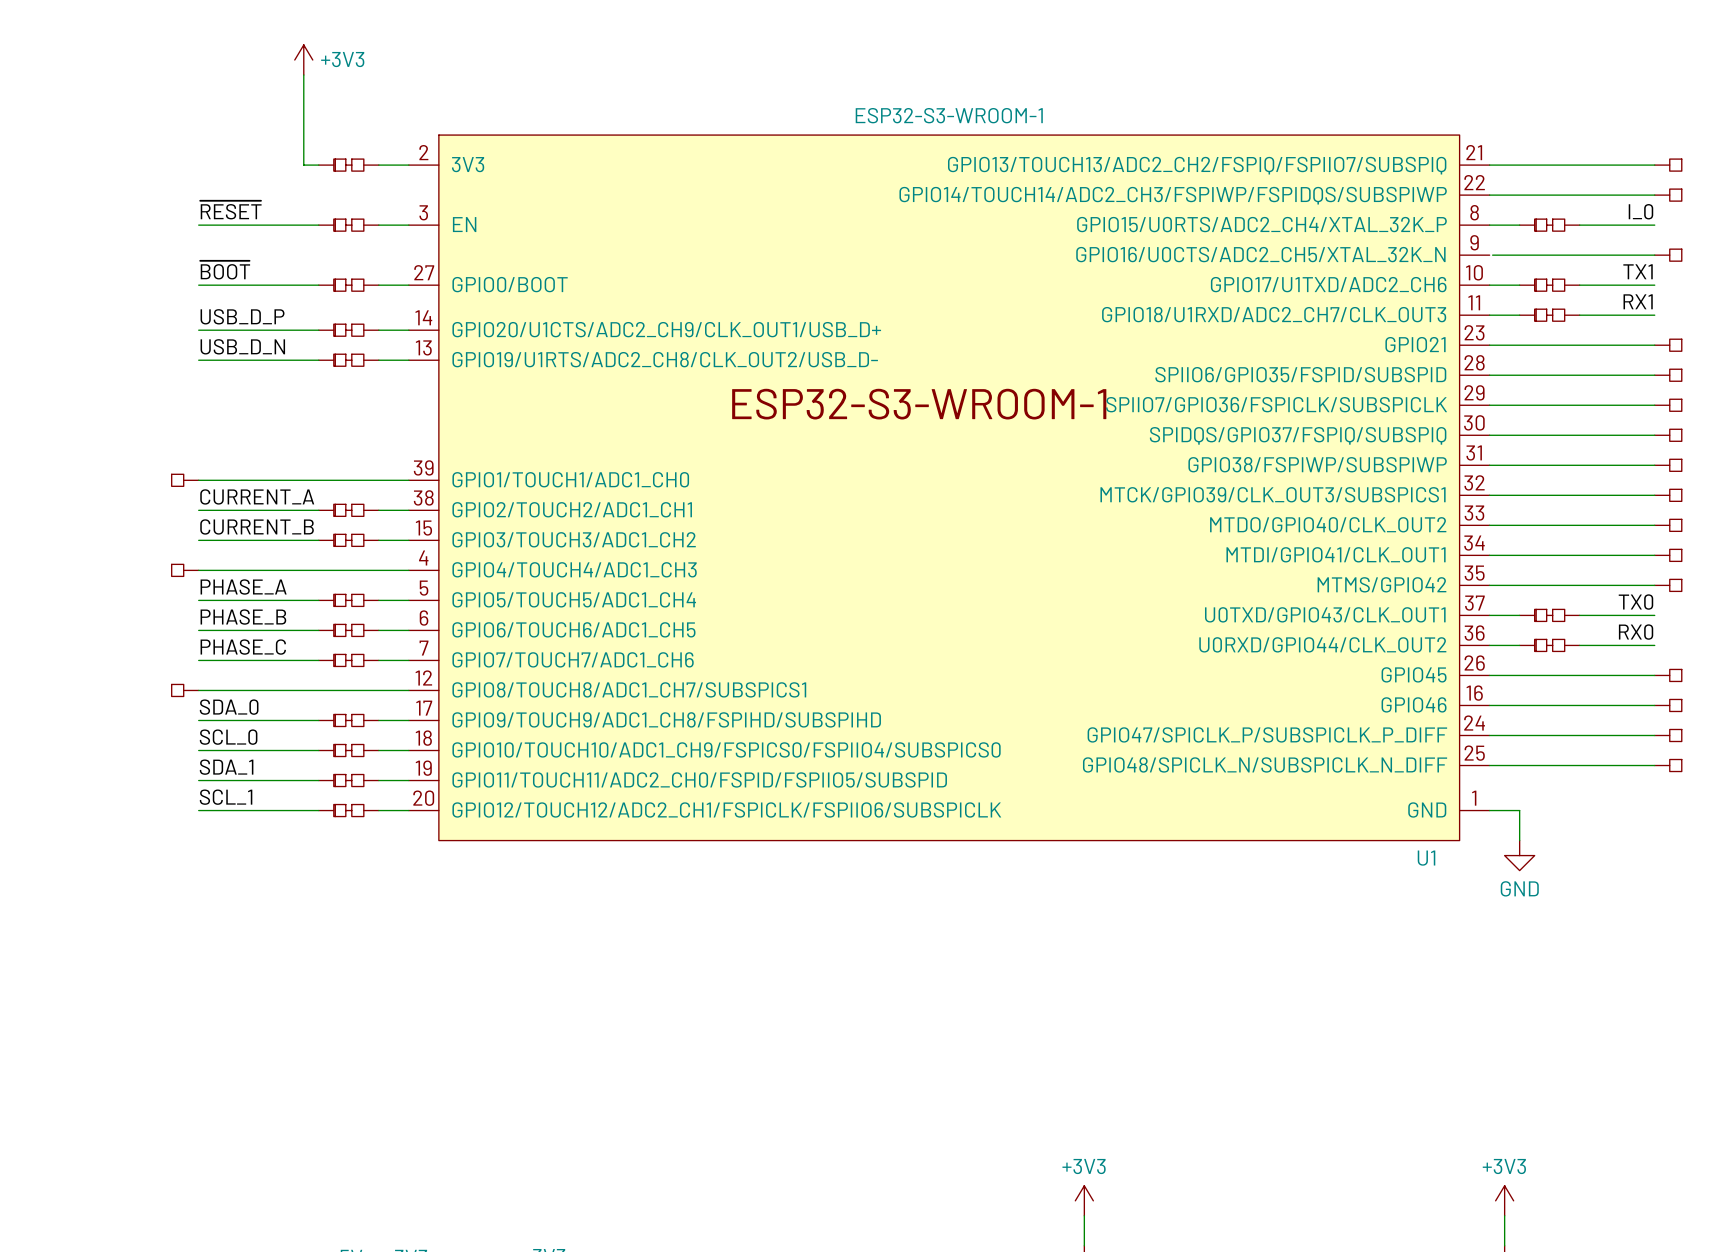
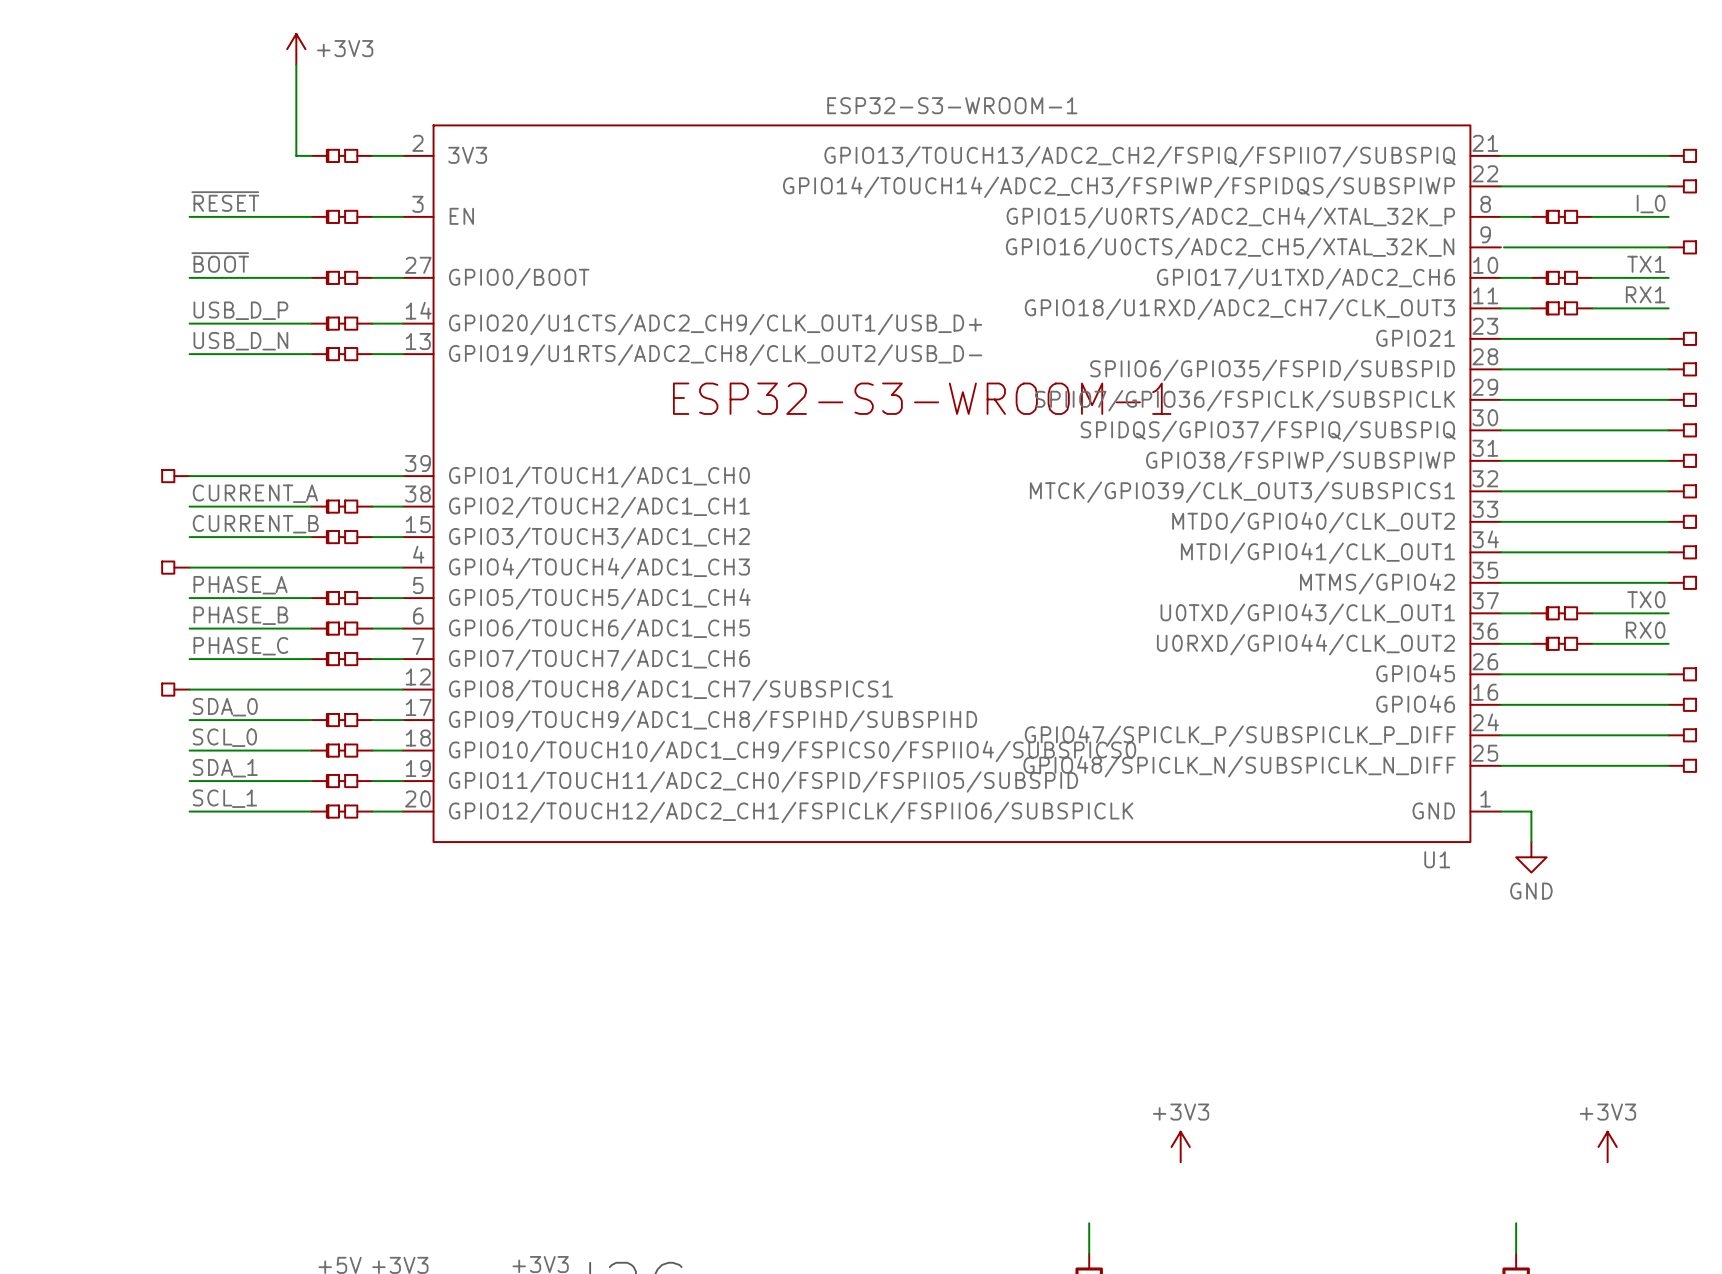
power symbol position: +3V3 (1084, 1200) -> +3V3 (1180, 1147)
power symbol position: +3V3 (1504, 1200) -> +3V3 (1607, 1147)

